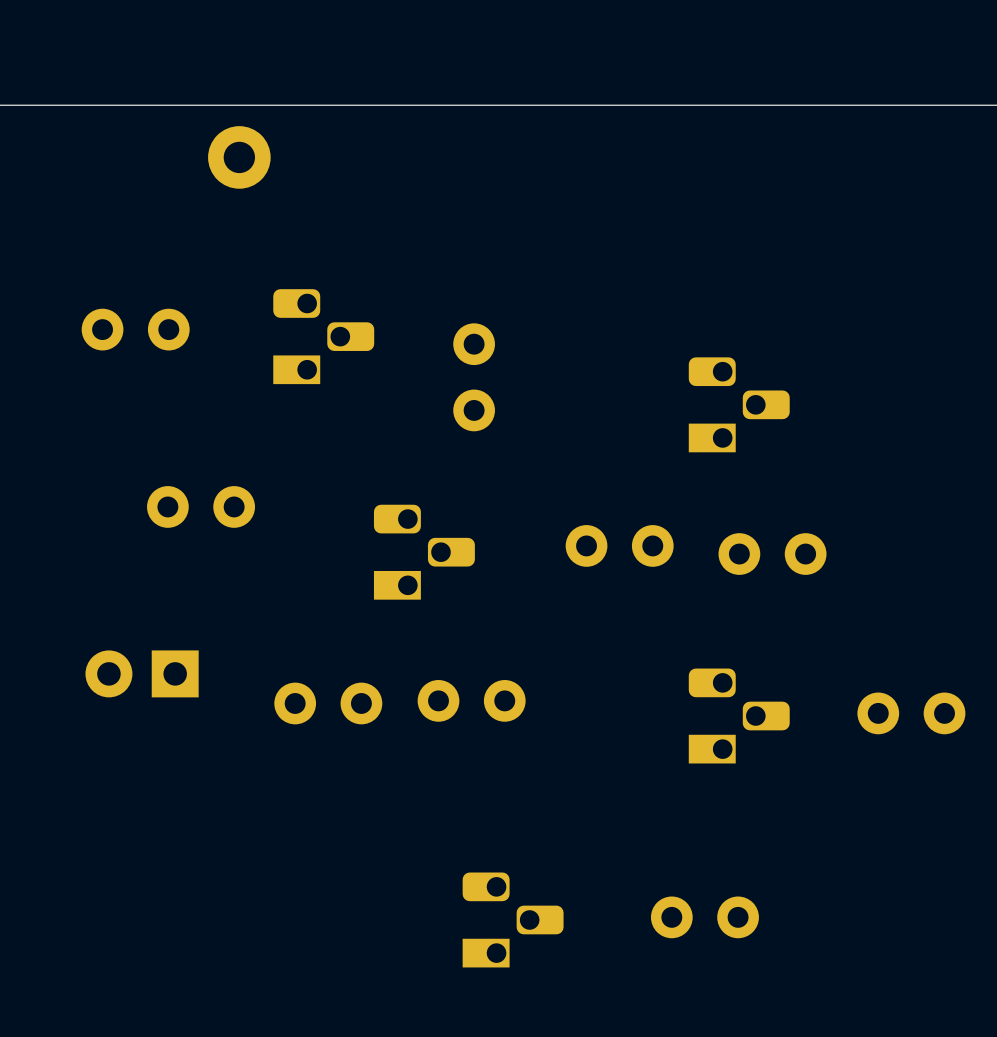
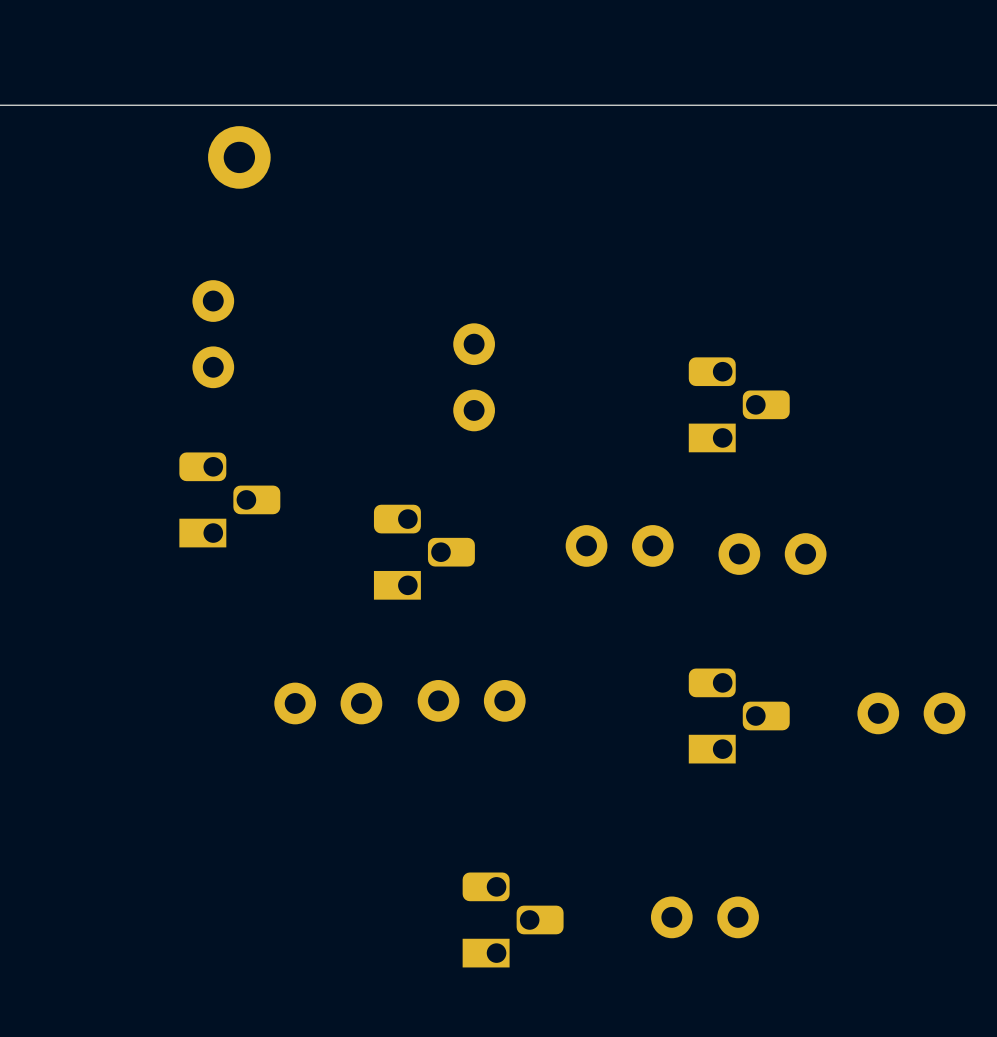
part rotation: 0° (135, 329) -> 90° clockwise (213, 334)
part position: (135, 329) -> (213, 334)
part position: (323, 336) -> (229, 499)
part: (201, 506) -> none
part: (142, 673) -> none

